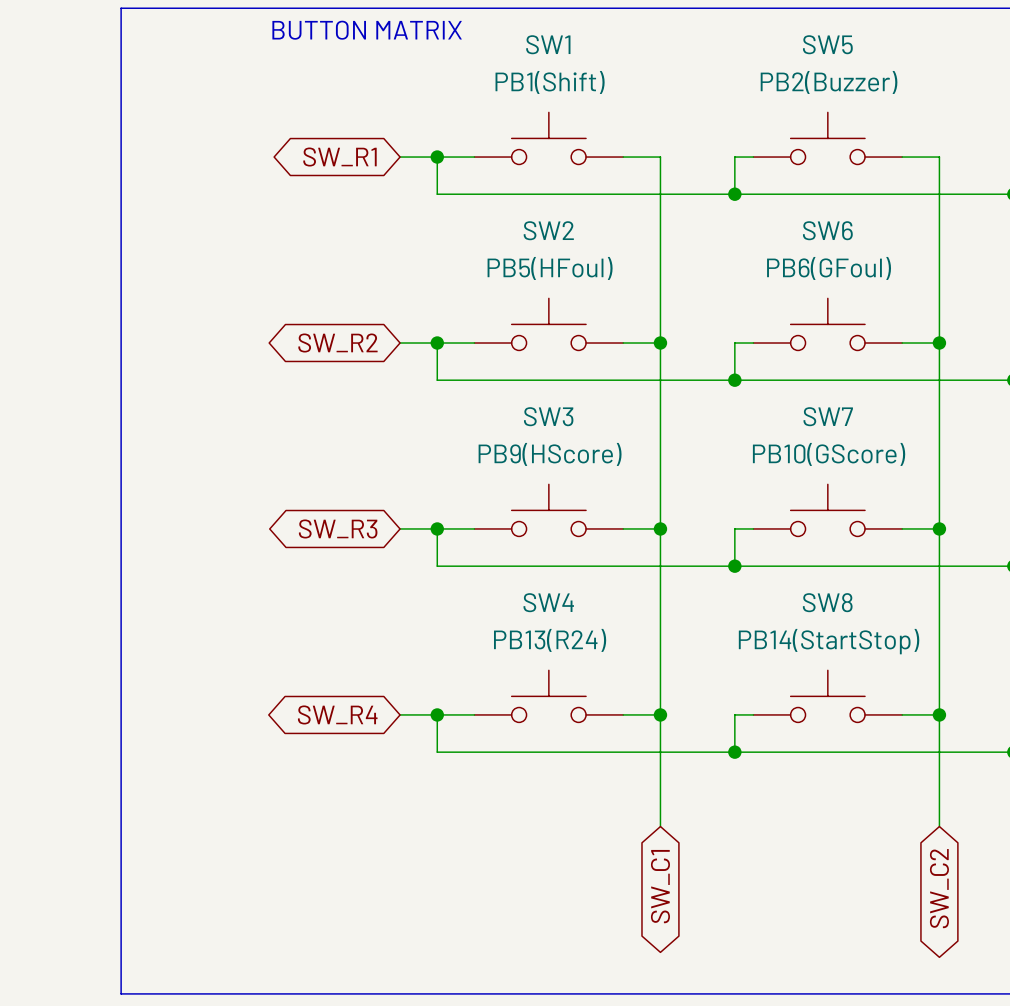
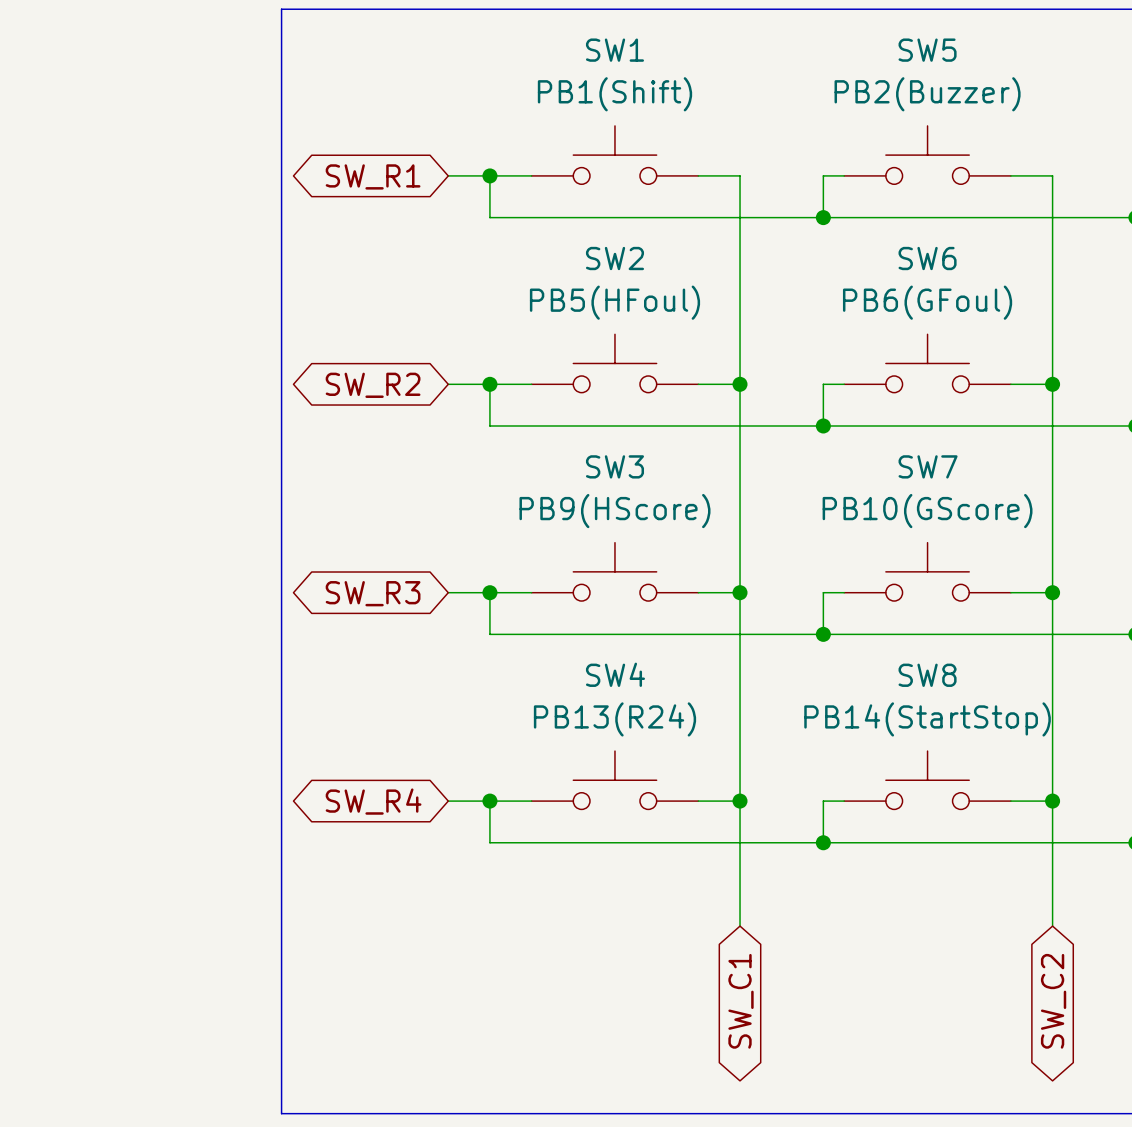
line: (251, 8) (121, 8) (121, 993) (251, 993) -> (281, 9) (281, 1113)
text: BUTTON MATRIX (367, 30) -> none

